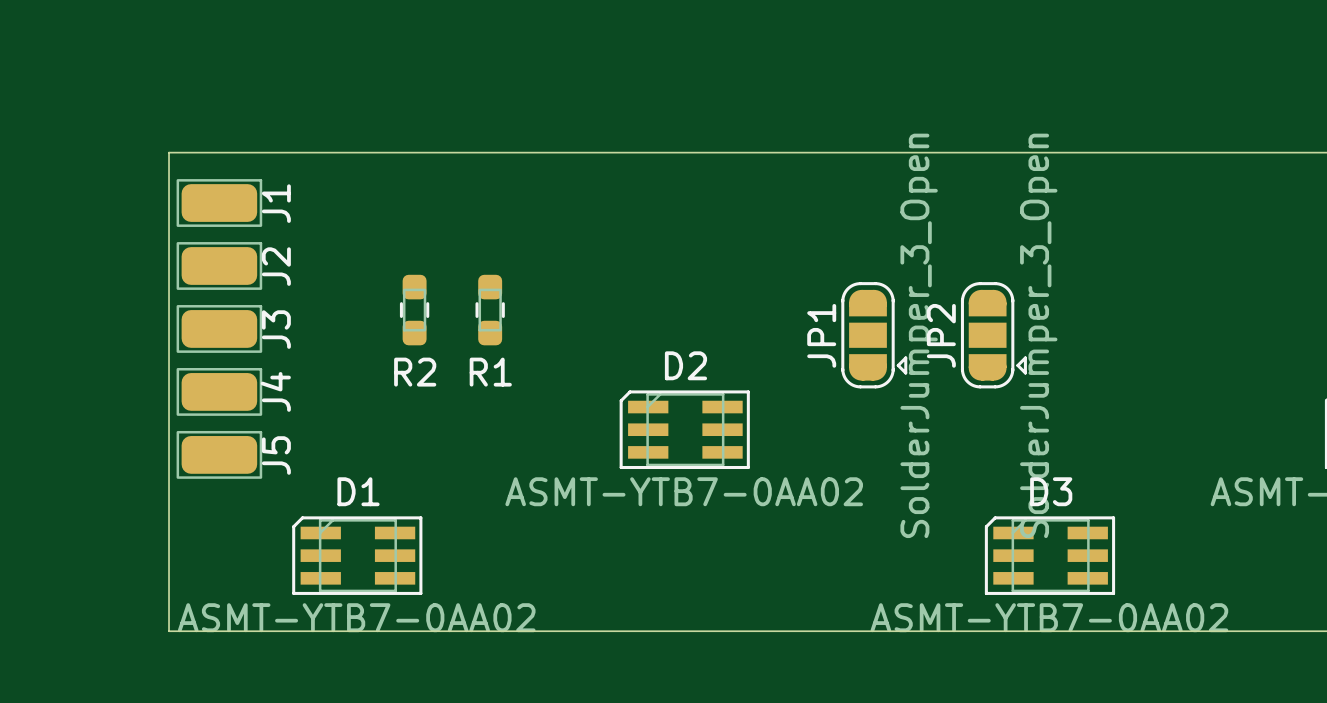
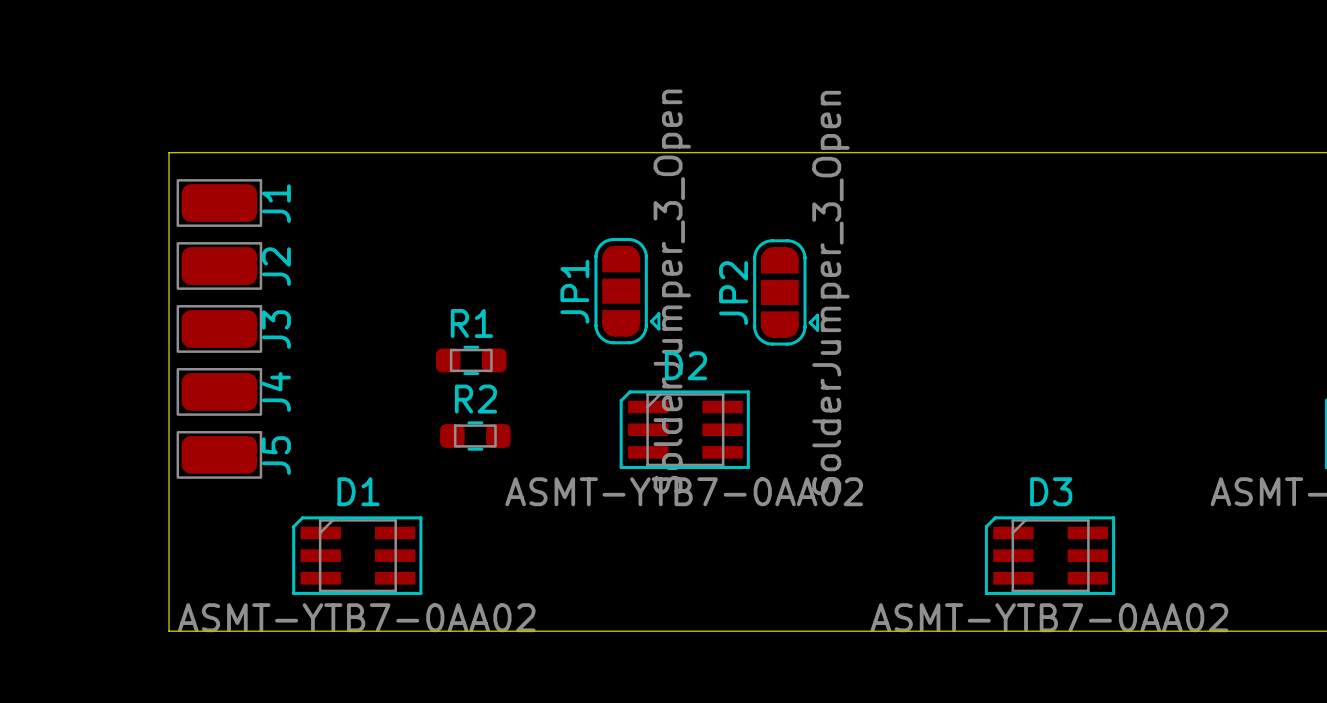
R2 rotation: 0° (414, 310) -> 90° clockwise (475, 436)
R2 position: (414, 310) -> (475, 436)
R1 rotation: 0° (490, 310) -> 90° clockwise (471, 360)
R1 position: (490, 310) -> (471, 360)
JP1 position: (874, 335) -> (627, 291)
JP2 position: (993, 335) -> (786, 292)
R2 name position: R2 (415, 372) -> R2 (475, 399)
R1 name position: R1 (490, 372) -> R1 (471, 323)

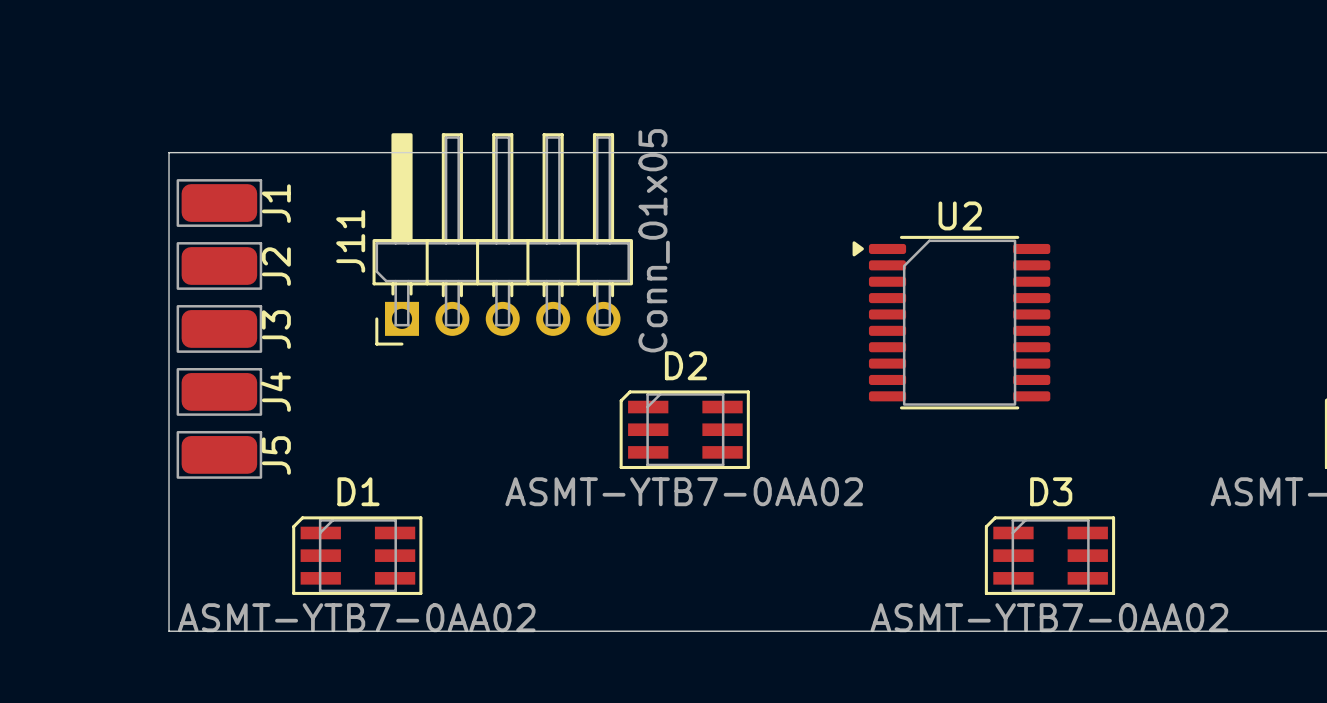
J11: none -> Conn_01x05 (502, 239)
JP1: SolderJumper_3_Open (627, 291) -> none
JP2: SolderJumper_3_Open (786, 292) -> none
U2: none -> (951, 322)
R1: (471, 360) -> none
R2: (475, 436) -> none

